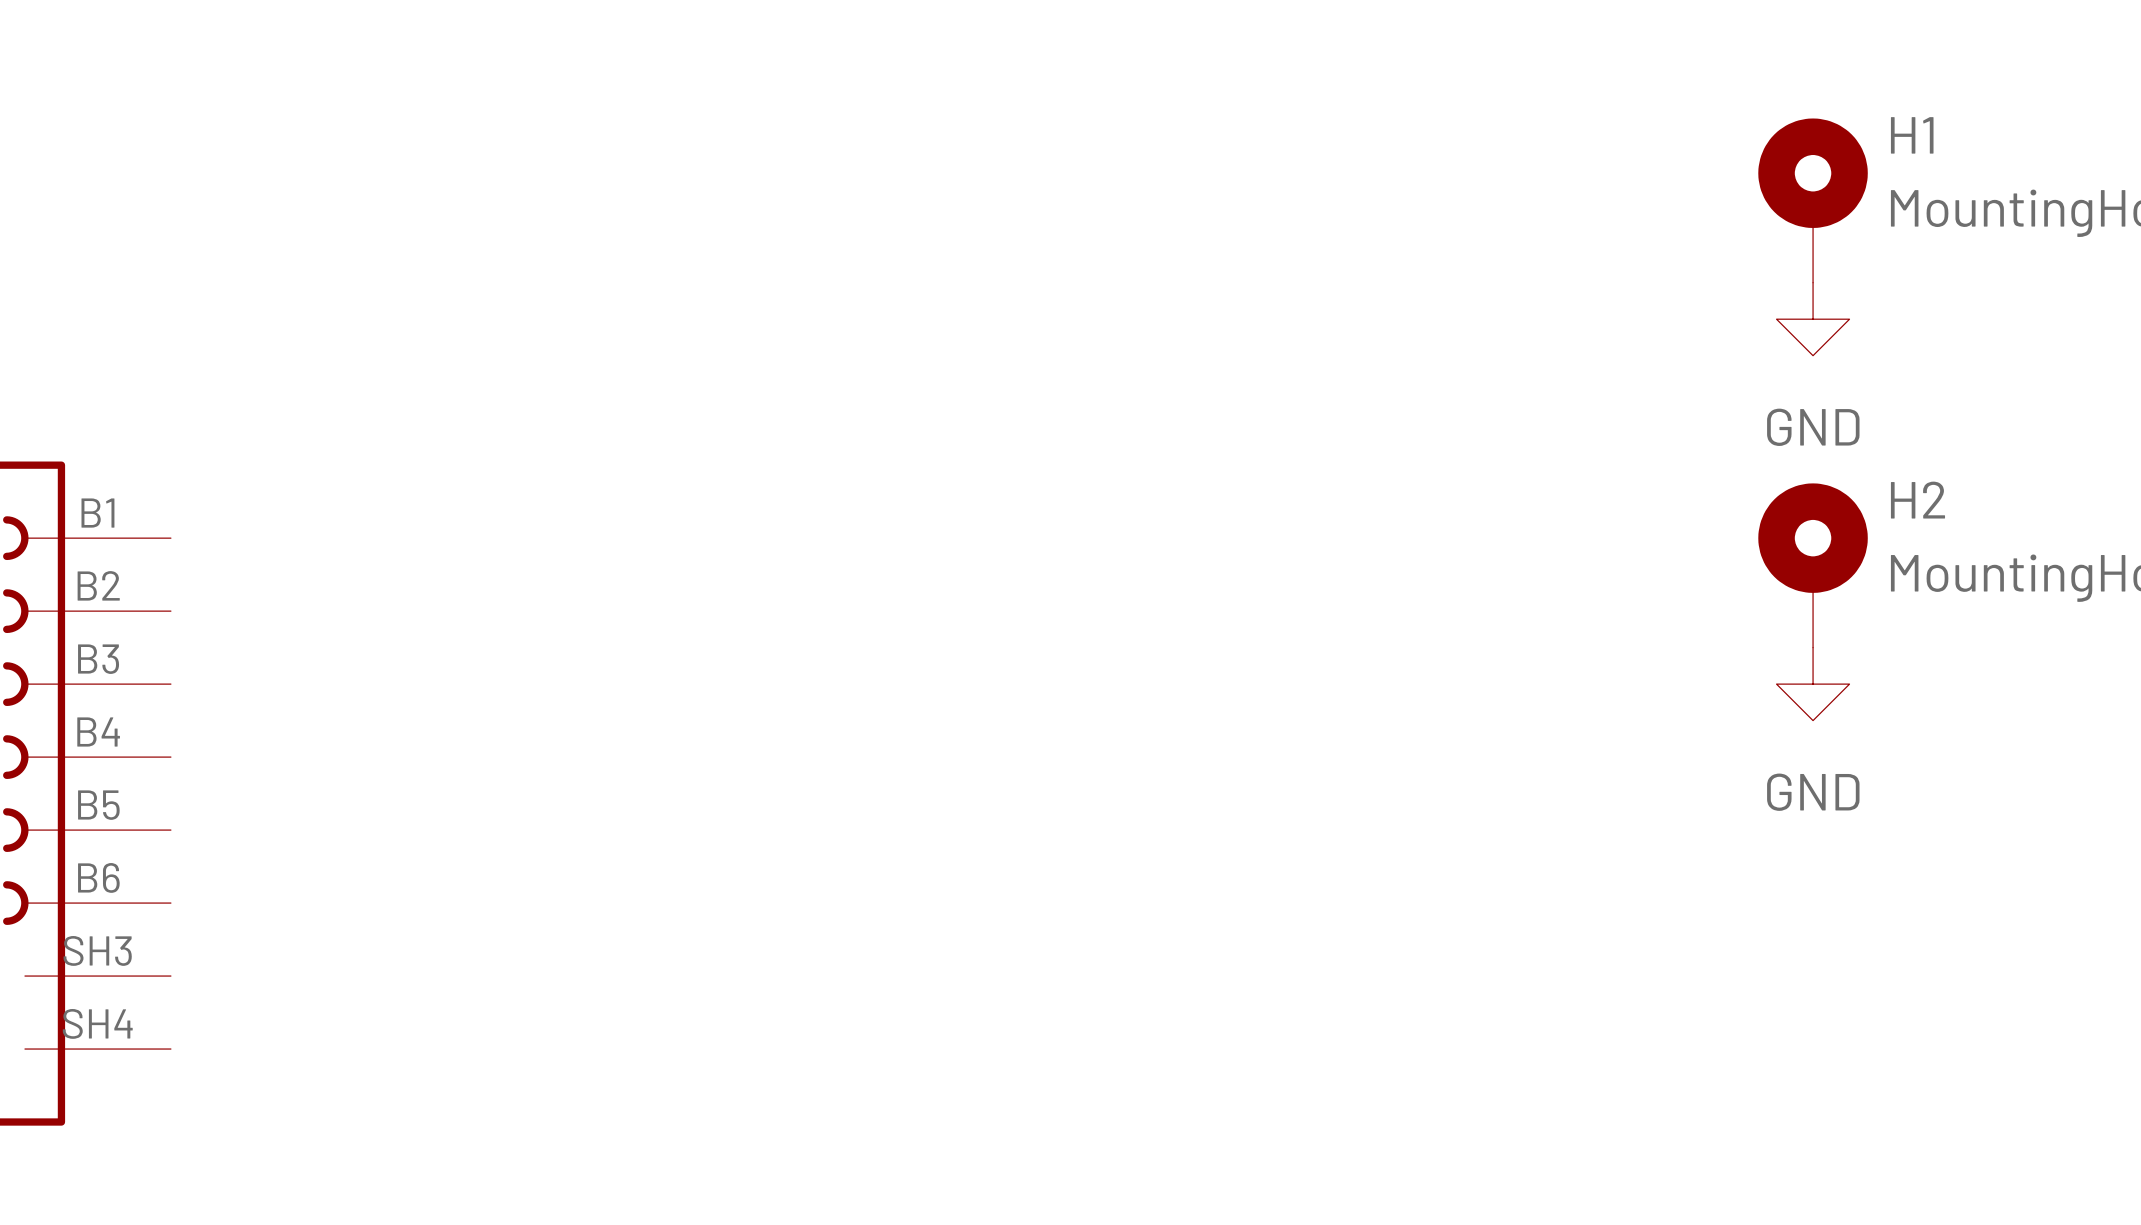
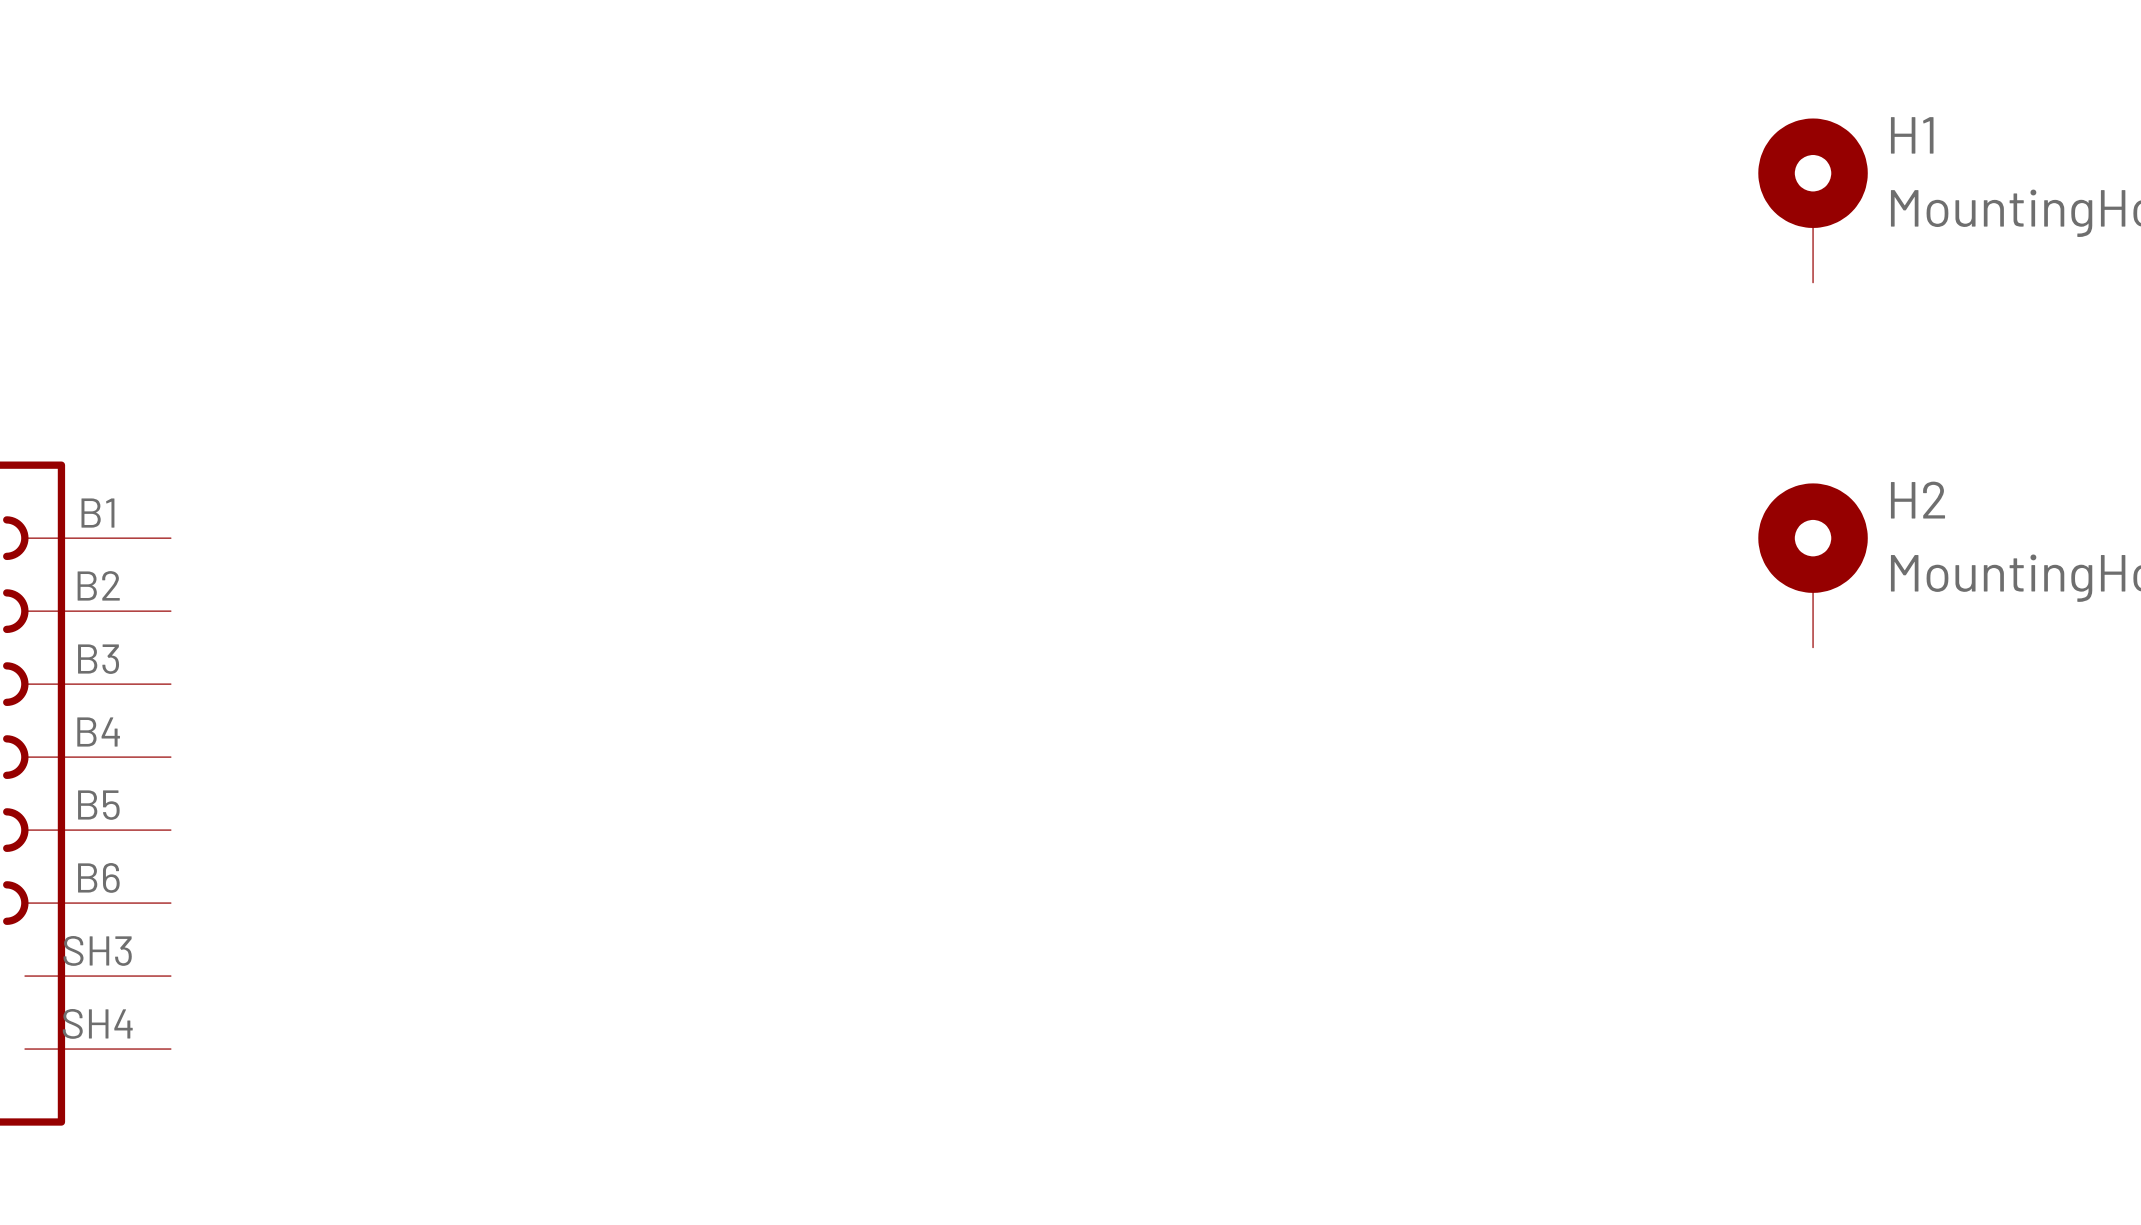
power symbol: GND (1813, 319) -> none
power symbol: GND (1813, 684) -> none

